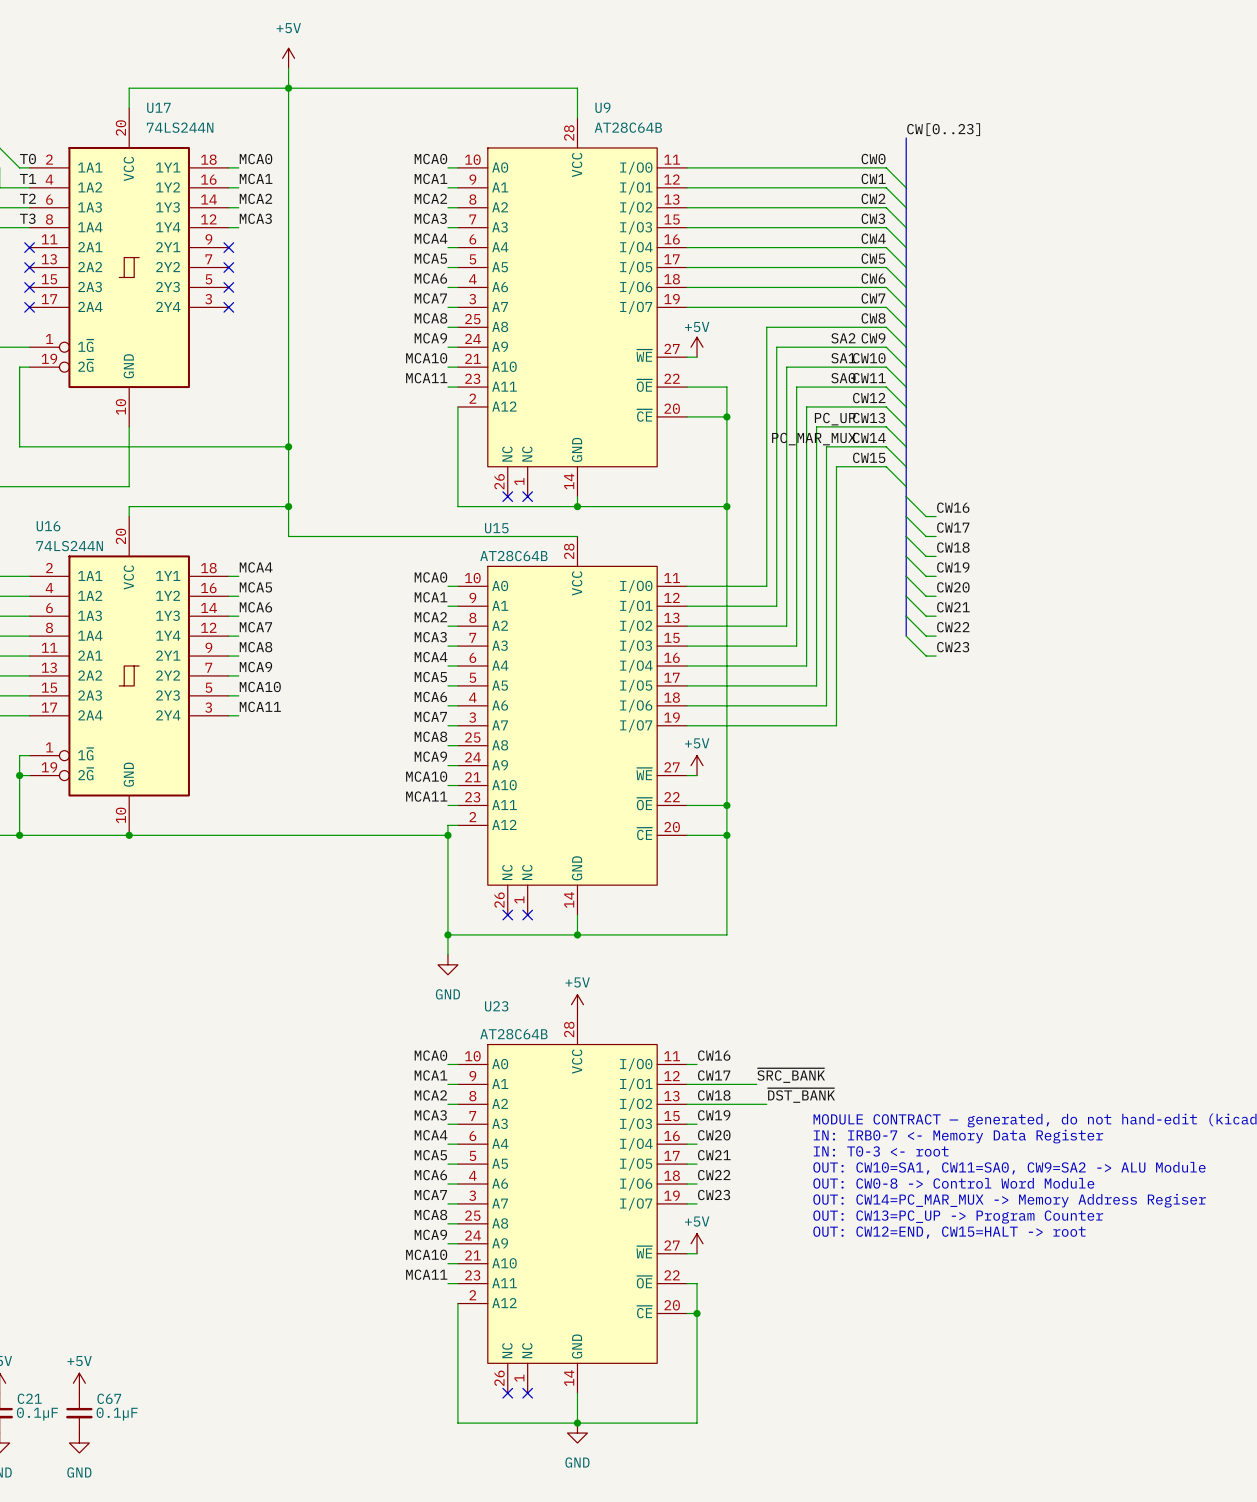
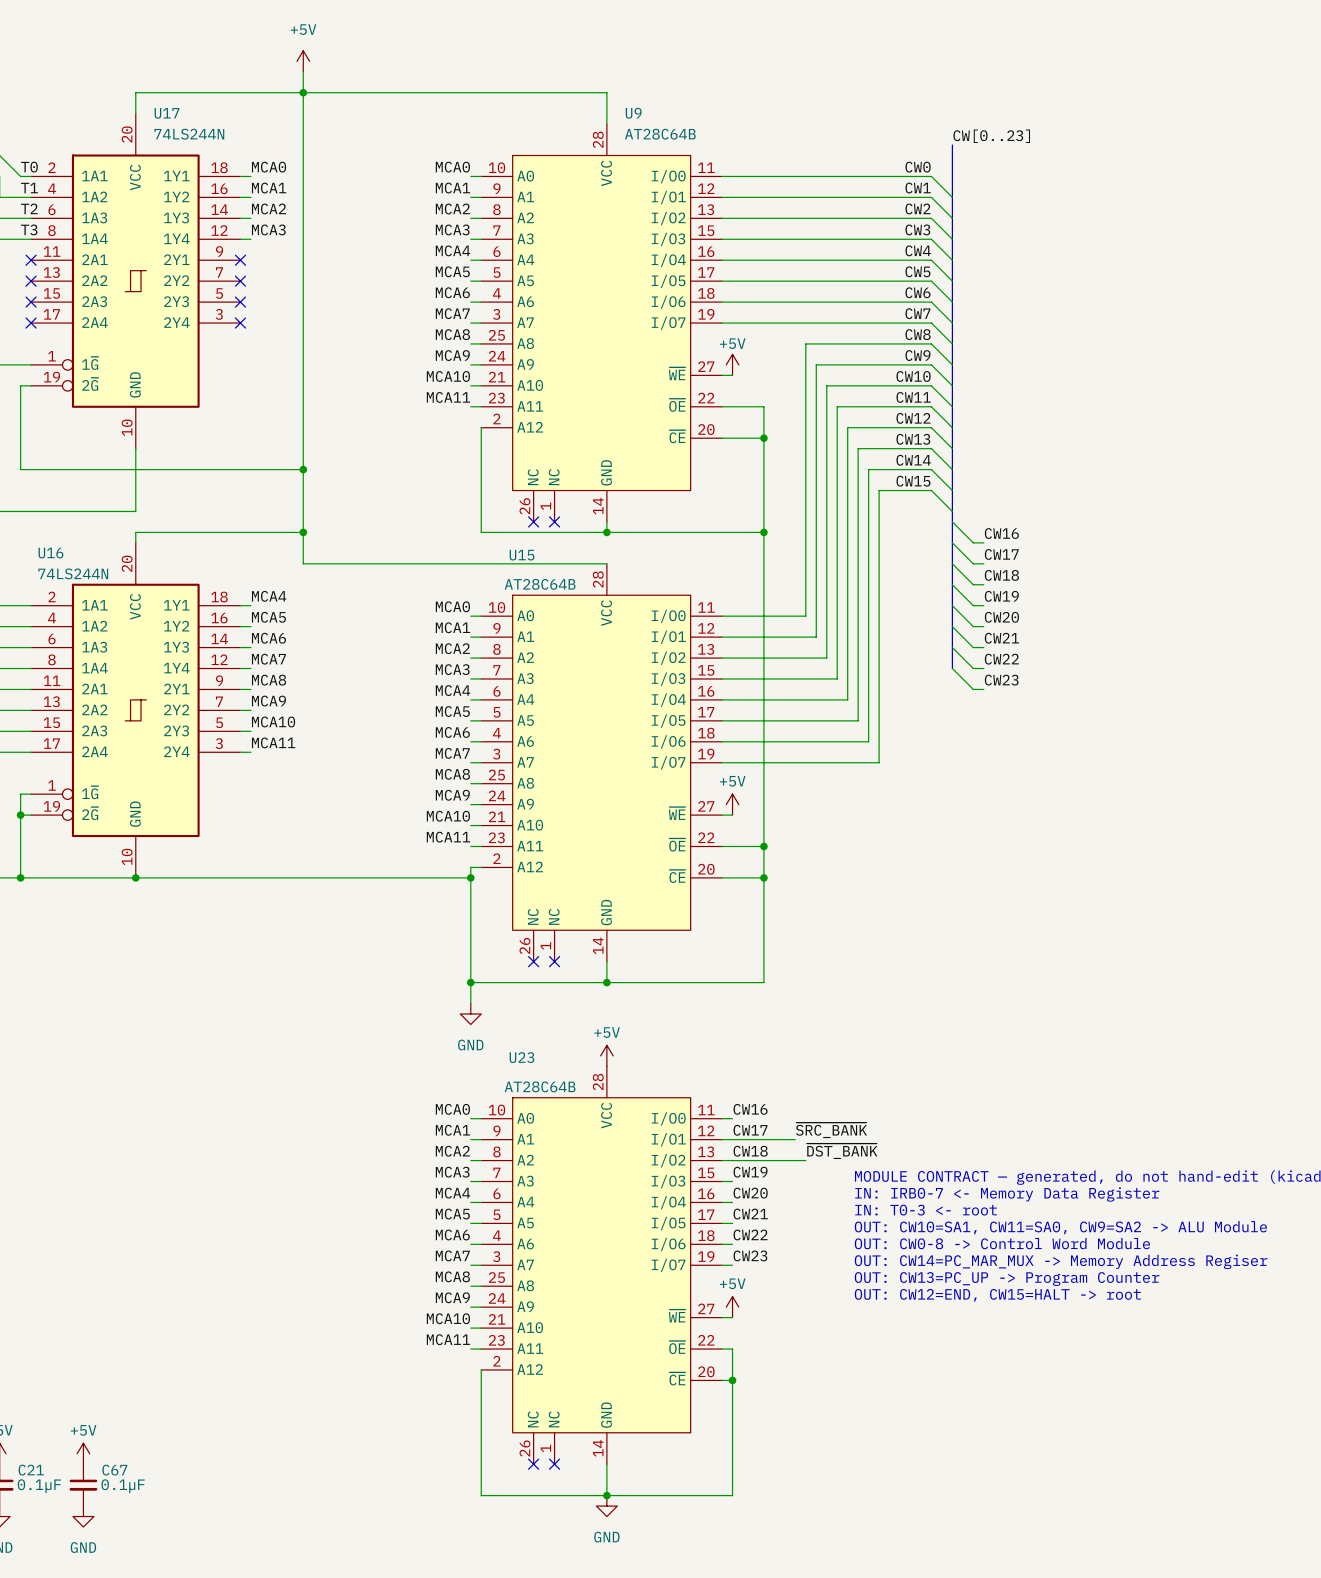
label: SA2 (843, 338) -> none
label: SA1 (843, 358) -> none
label: SA0 (843, 378) -> none
label: PC_UP (835, 419) -> none
label: PC_MAR_MUX (814, 439) -> none

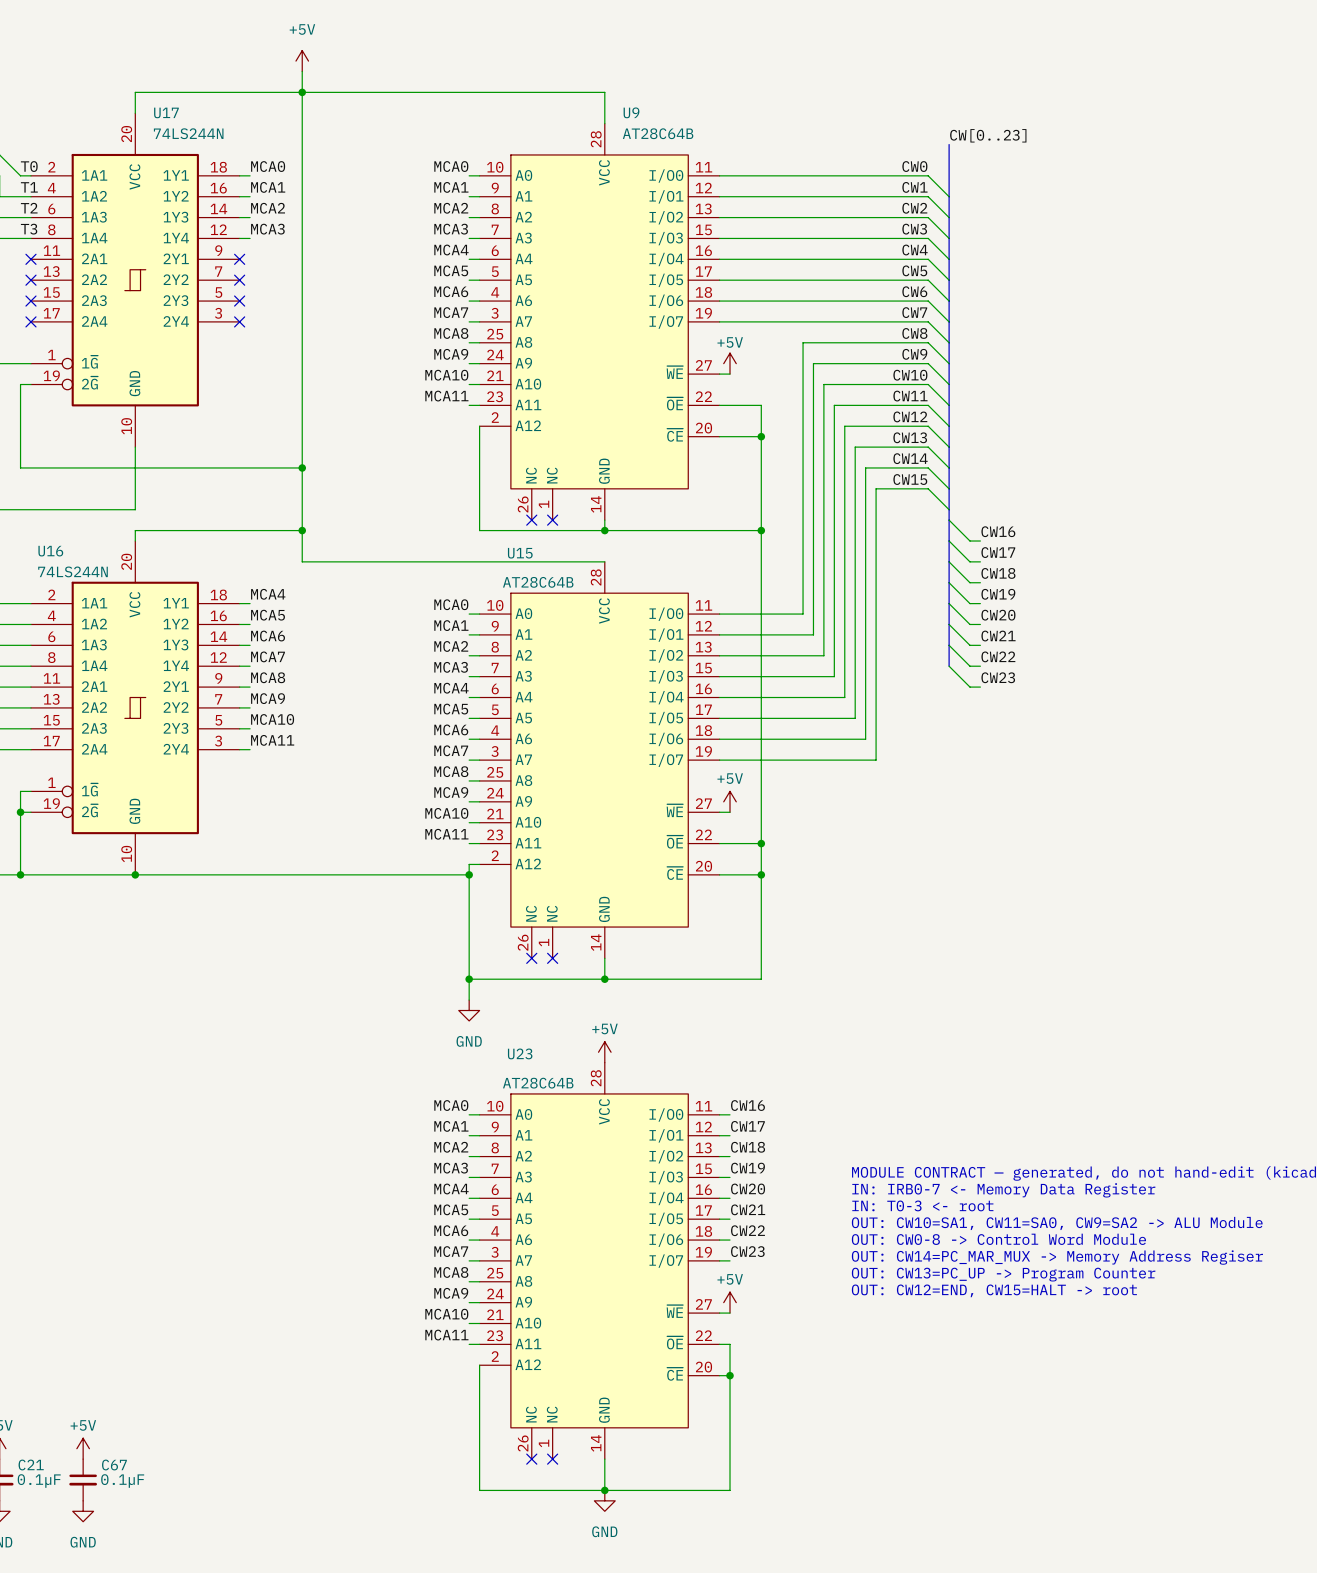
label: ~{SRC_BANK} (831, 1130) -> none
wire: (732, 1139) (795, 1139) -> none
label: ~{DST_BANK} (842, 1151) -> none
wire: (732, 1160) (805, 1160) -> none

